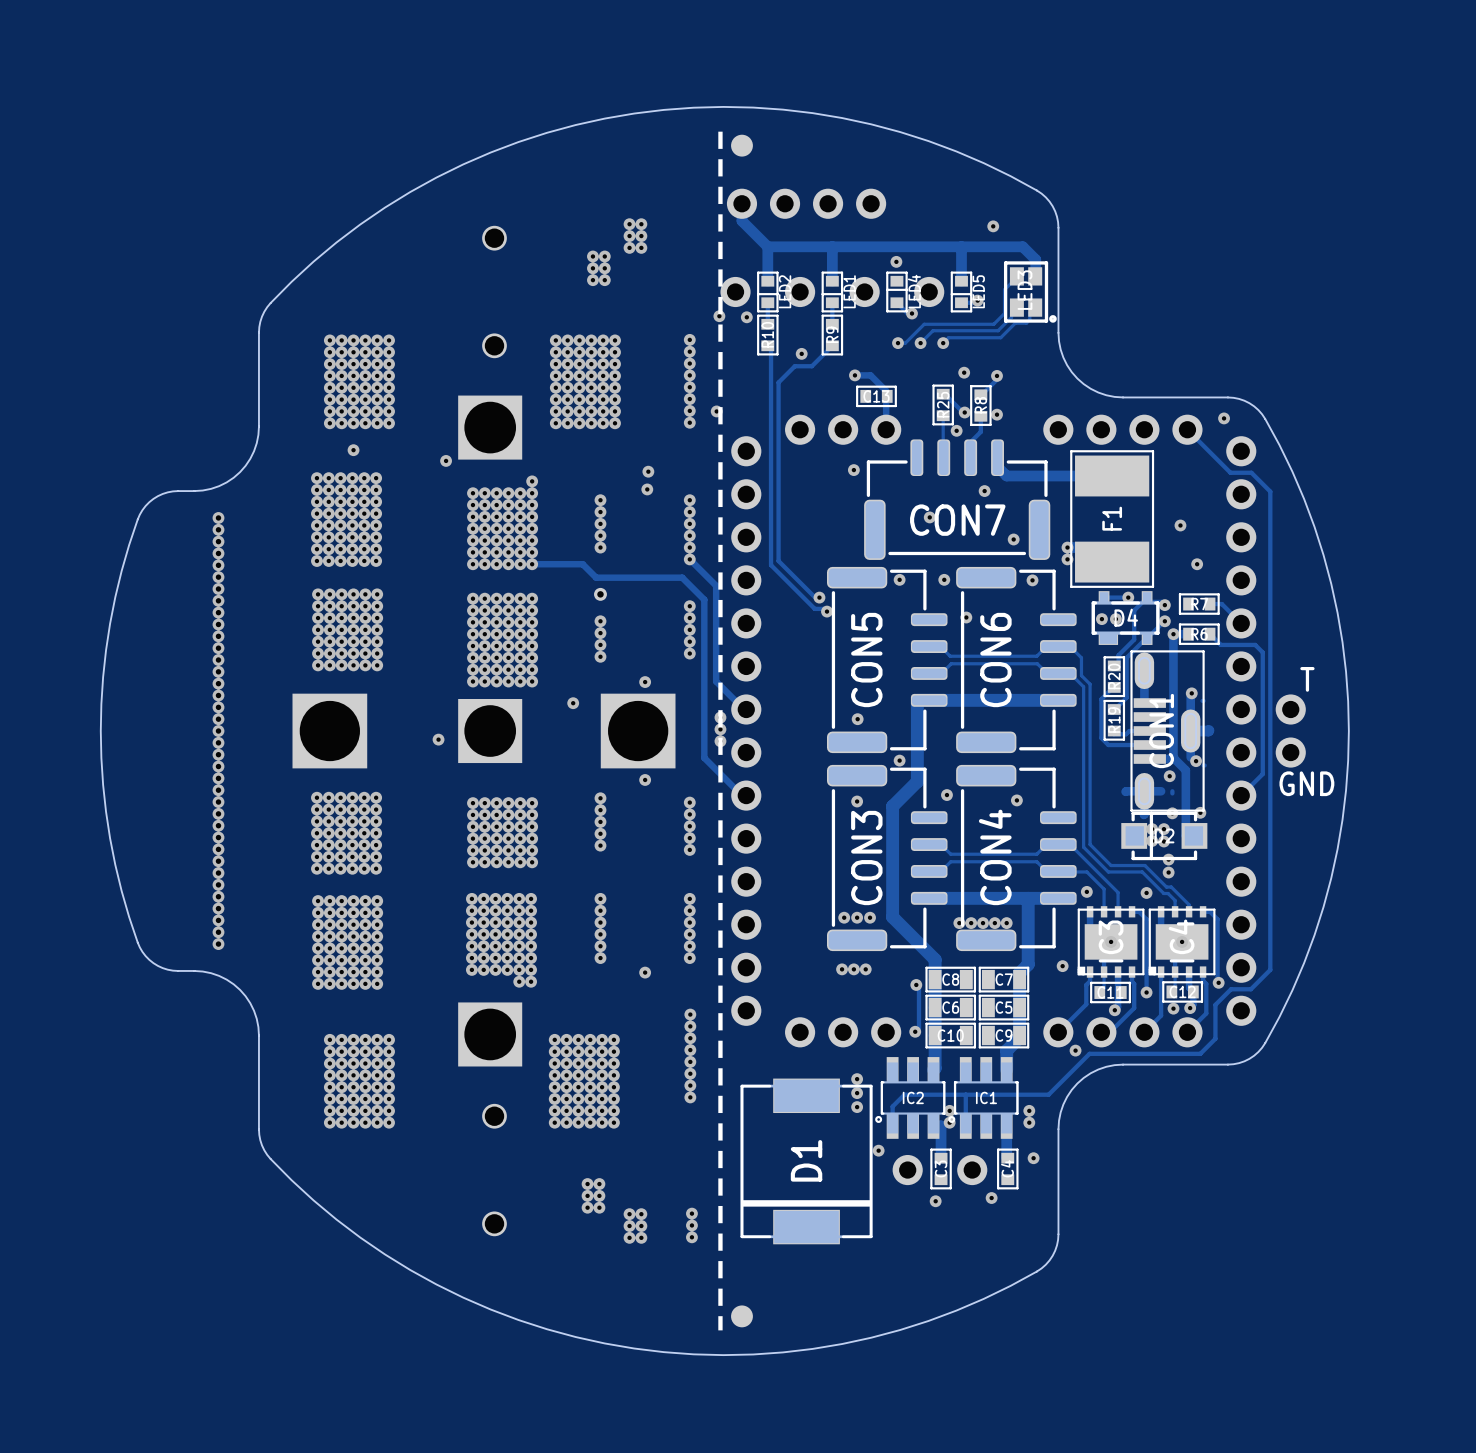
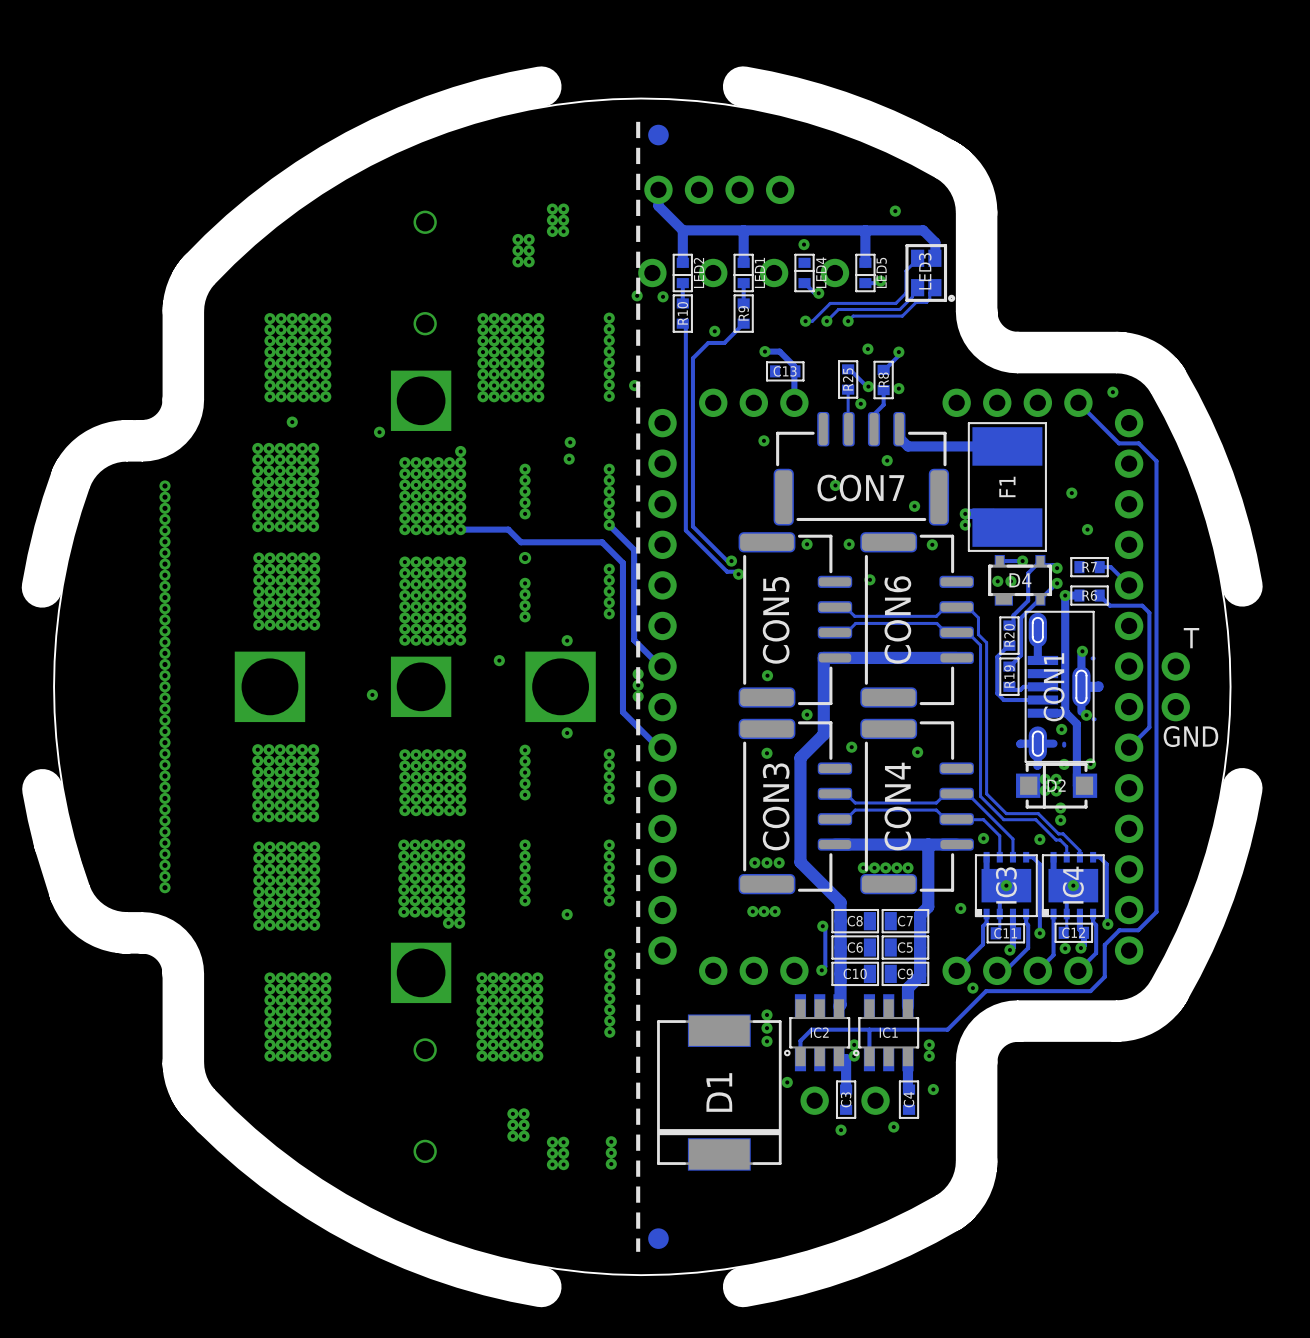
board edge: none -> (541, 86) (459, 106) (406, 125) (355, 150) (283, 195) (219, 249) (193, 276) (183, 299) (182, 399) (178, 418) (168, 430) (160, 436) (146, 440) (120, 440) (107, 443) (90, 452) (81, 460) (71, 475) (62, 503) (42, 587)
board edge: none -> (743, 86) (791, 96) (863, 119) (931, 151) (959, 170) (971, 186) (976, 205) (978, 320) (983, 334) (994, 344) (1012, 351) (1127, 353) (1144, 358) (1159, 369) (1166, 378) (1180, 402) (1214, 478) (1230, 531) (1242, 586)
board edge: none -> (1242, 788) (1223, 867) (1205, 918) (1182, 967) (1169, 991) (1158, 1004) (1142, 1015) (1123, 1021) (1008, 1022) (995, 1028) (984, 1038) (977, 1057) (975, 1173) (967, 1193) (958, 1204) (950, 1211) (901, 1237) (850, 1258) (797, 1275) (743, 1286)
board edge: none -> (42, 789) (54, 842) (69, 893) (80, 911) (95, 924) (108, 930) (156, 936) (169, 943) (178, 955) (182, 969) (183, 1072) (192, 1095) (211, 1117) (251, 1153) (294, 1186) (363, 1227) (412, 1250) (462, 1268) (541, 1286)

